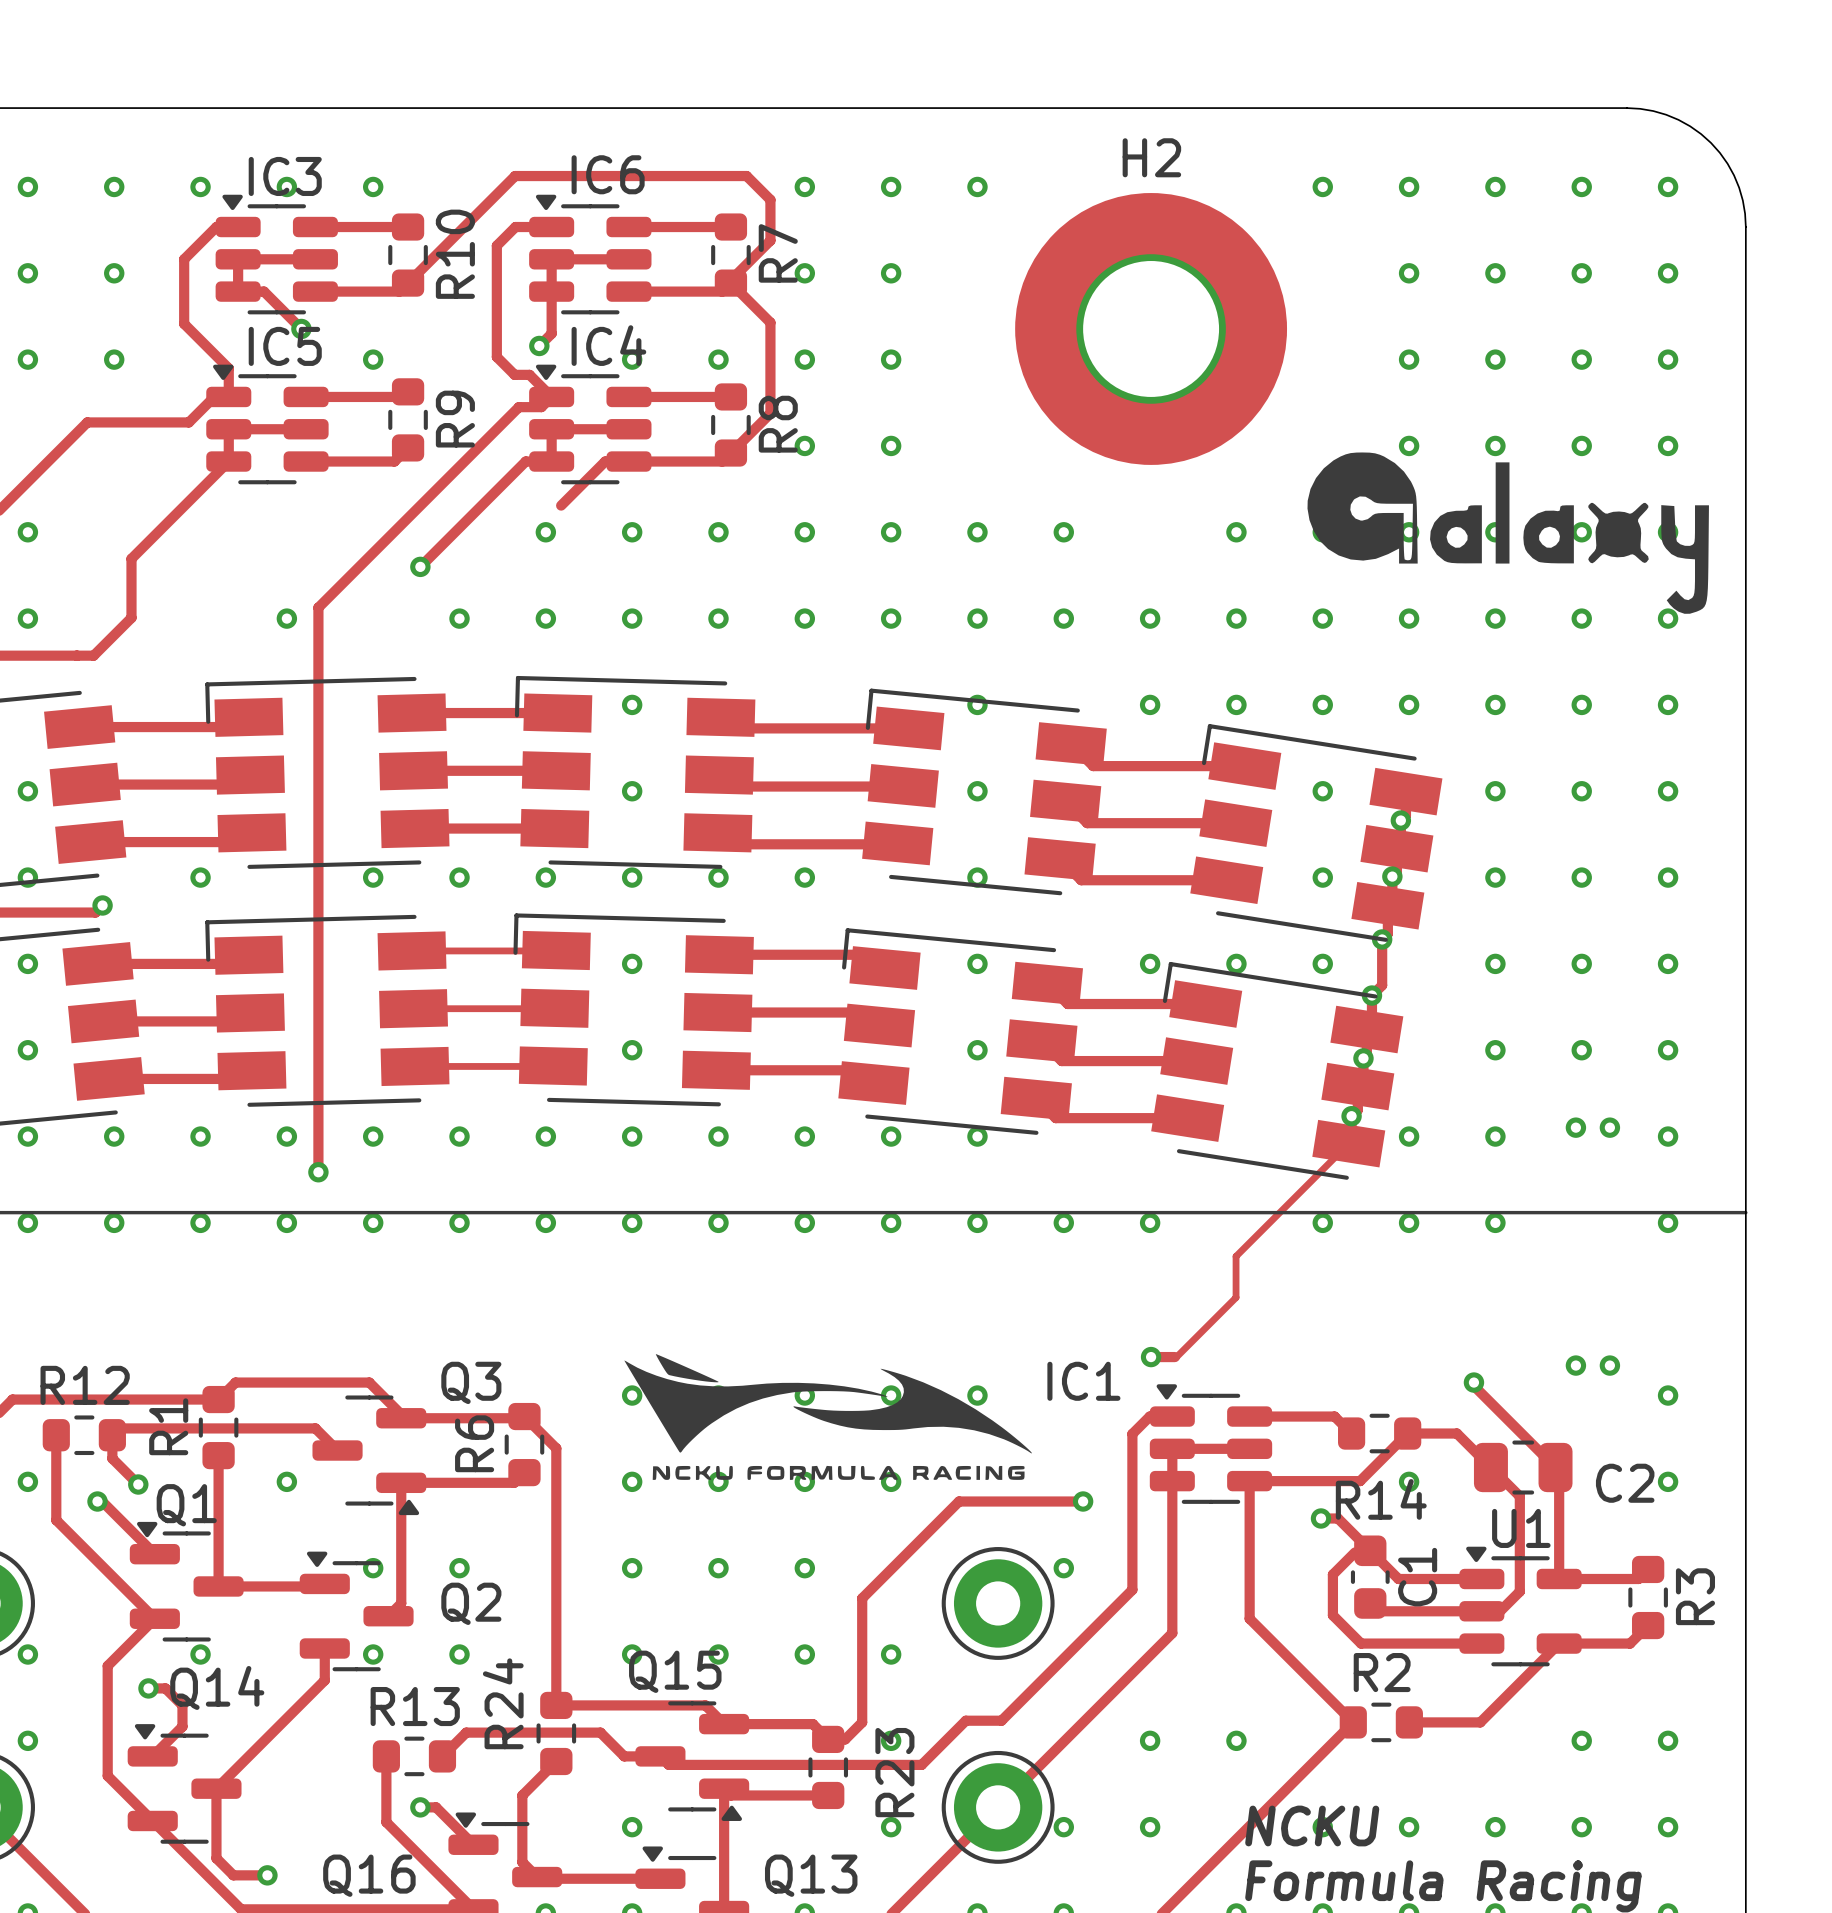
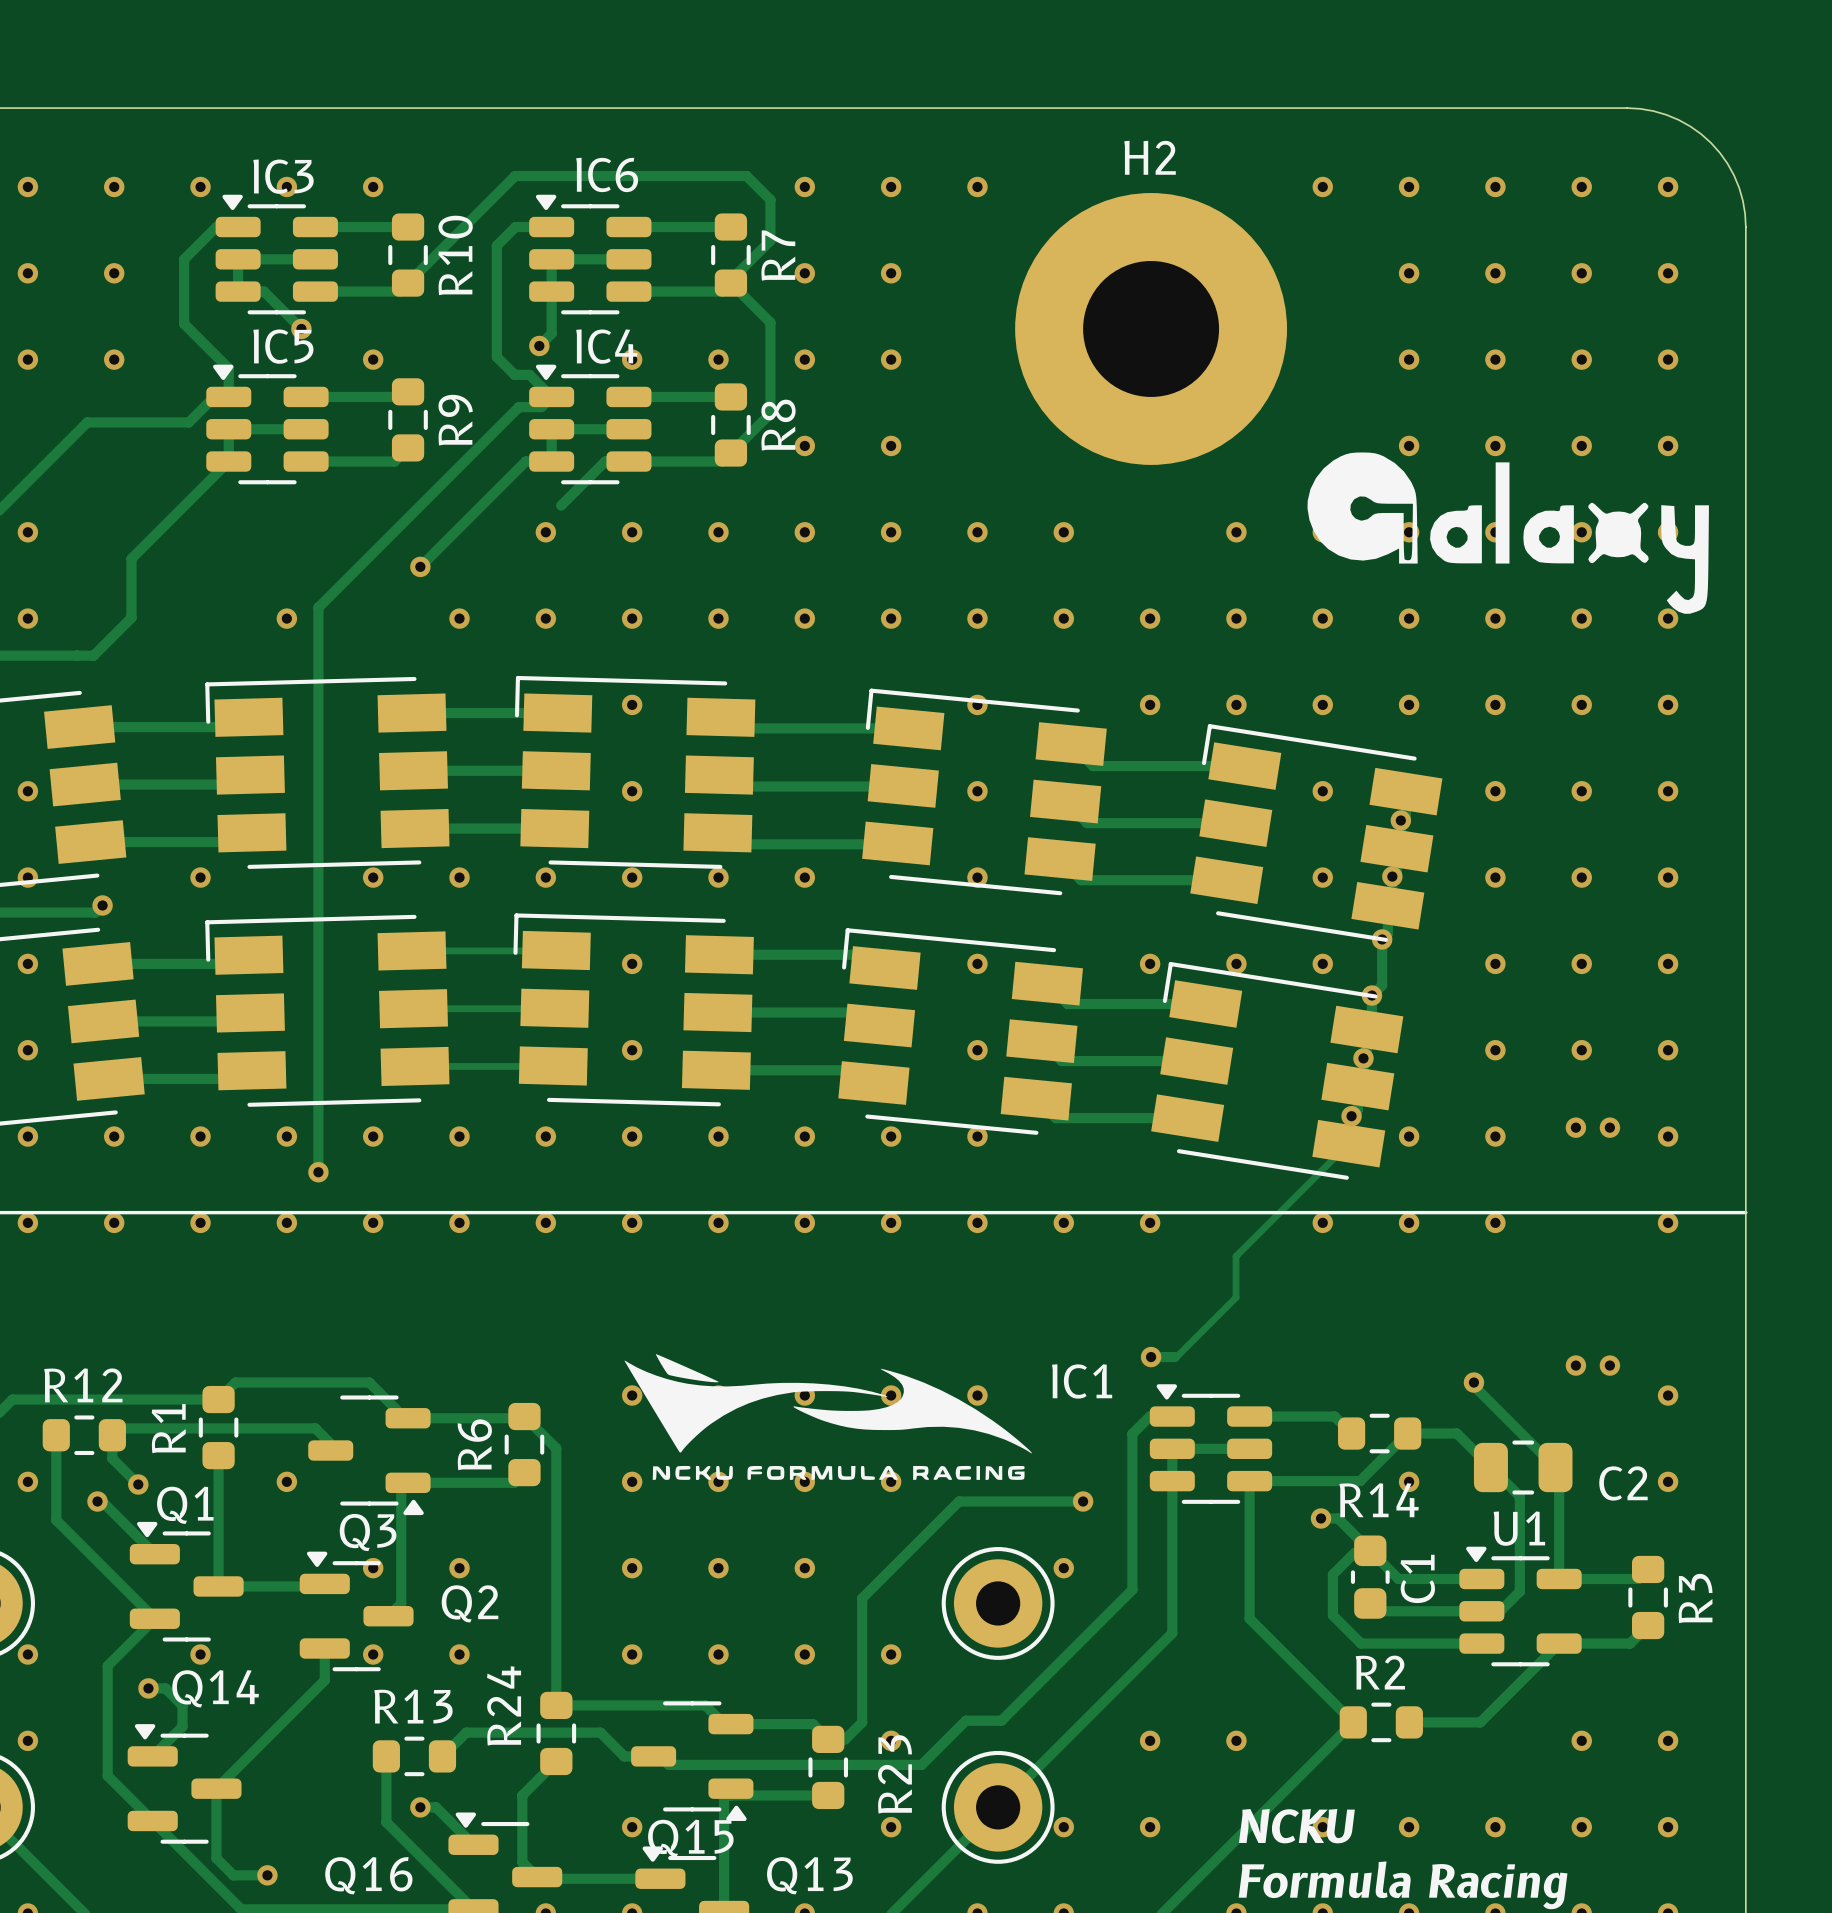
Q3 name position: Q3 (471, 1382) -> Q3 (368, 1532)
Q3 footprint: [312, 1395, 427, 1516] -> [308, 1395, 431, 1516]
Q15 name position: Q15 (675, 1671) -> Q15 (690, 1838)
Q15 footprint: [635, 1701, 750, 1821] -> [631, 1701, 754, 1821]

